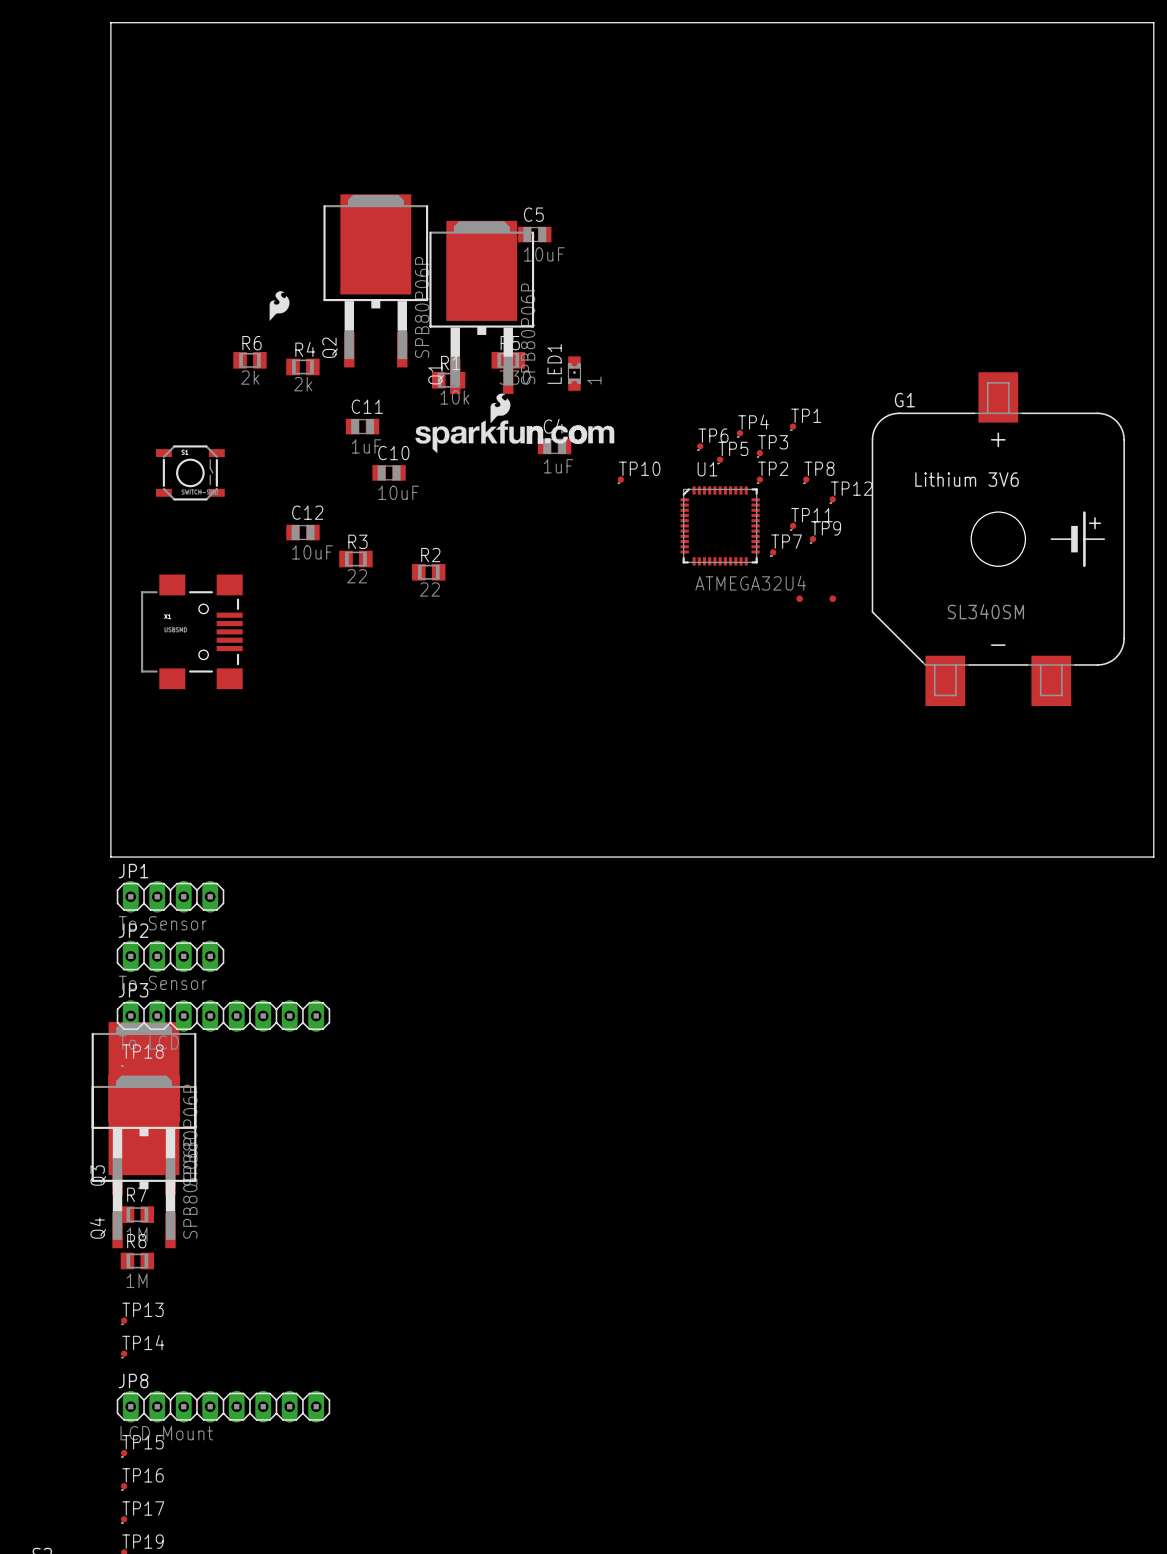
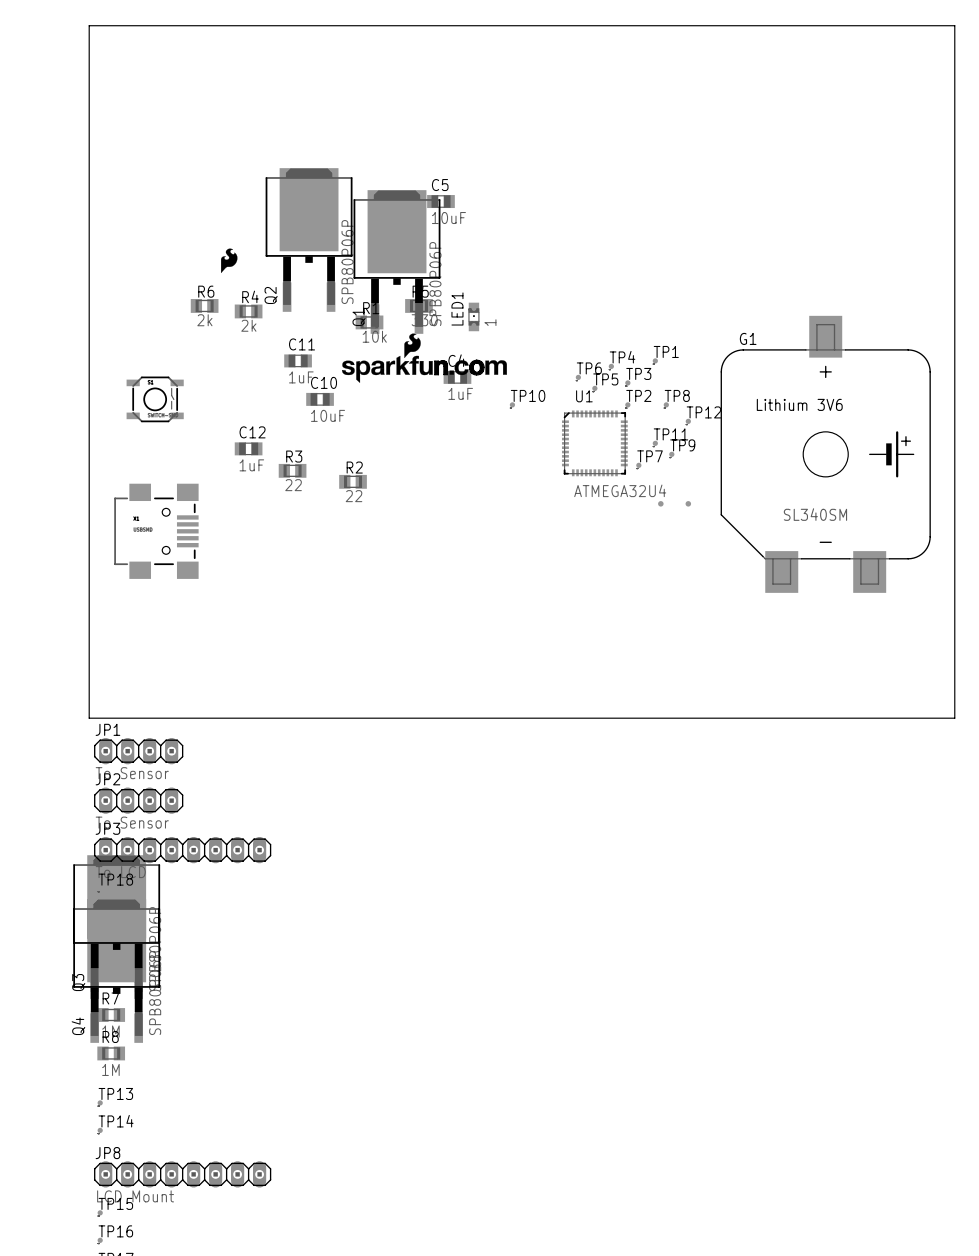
C12 value: 10uF (312, 552) -> 1uF (251, 465)

